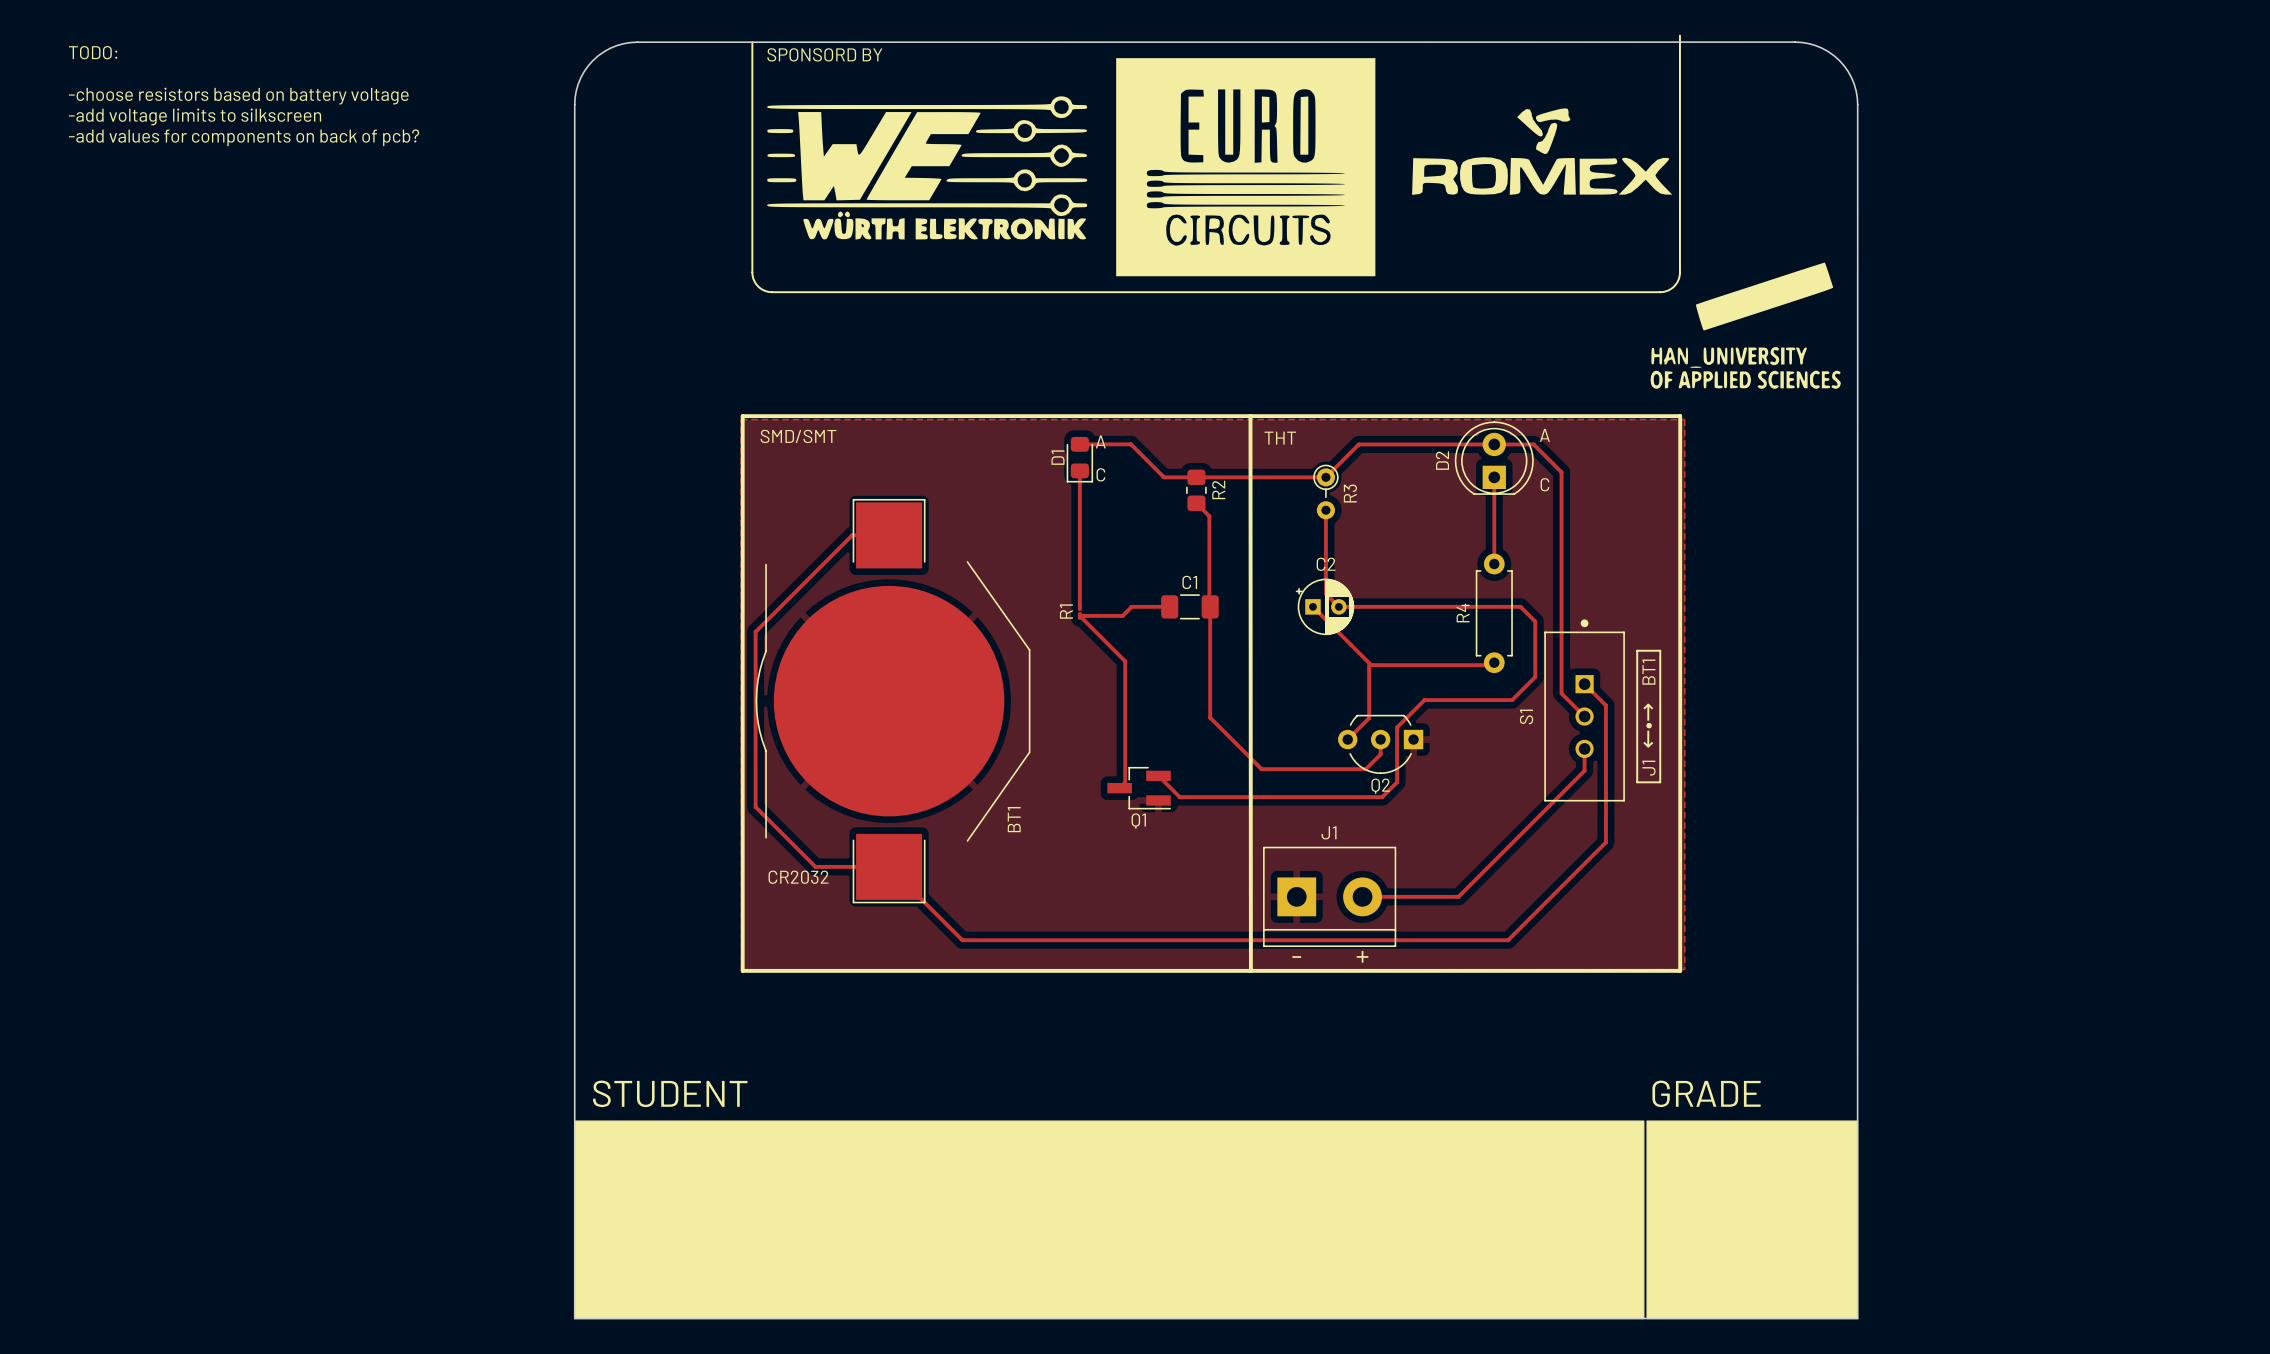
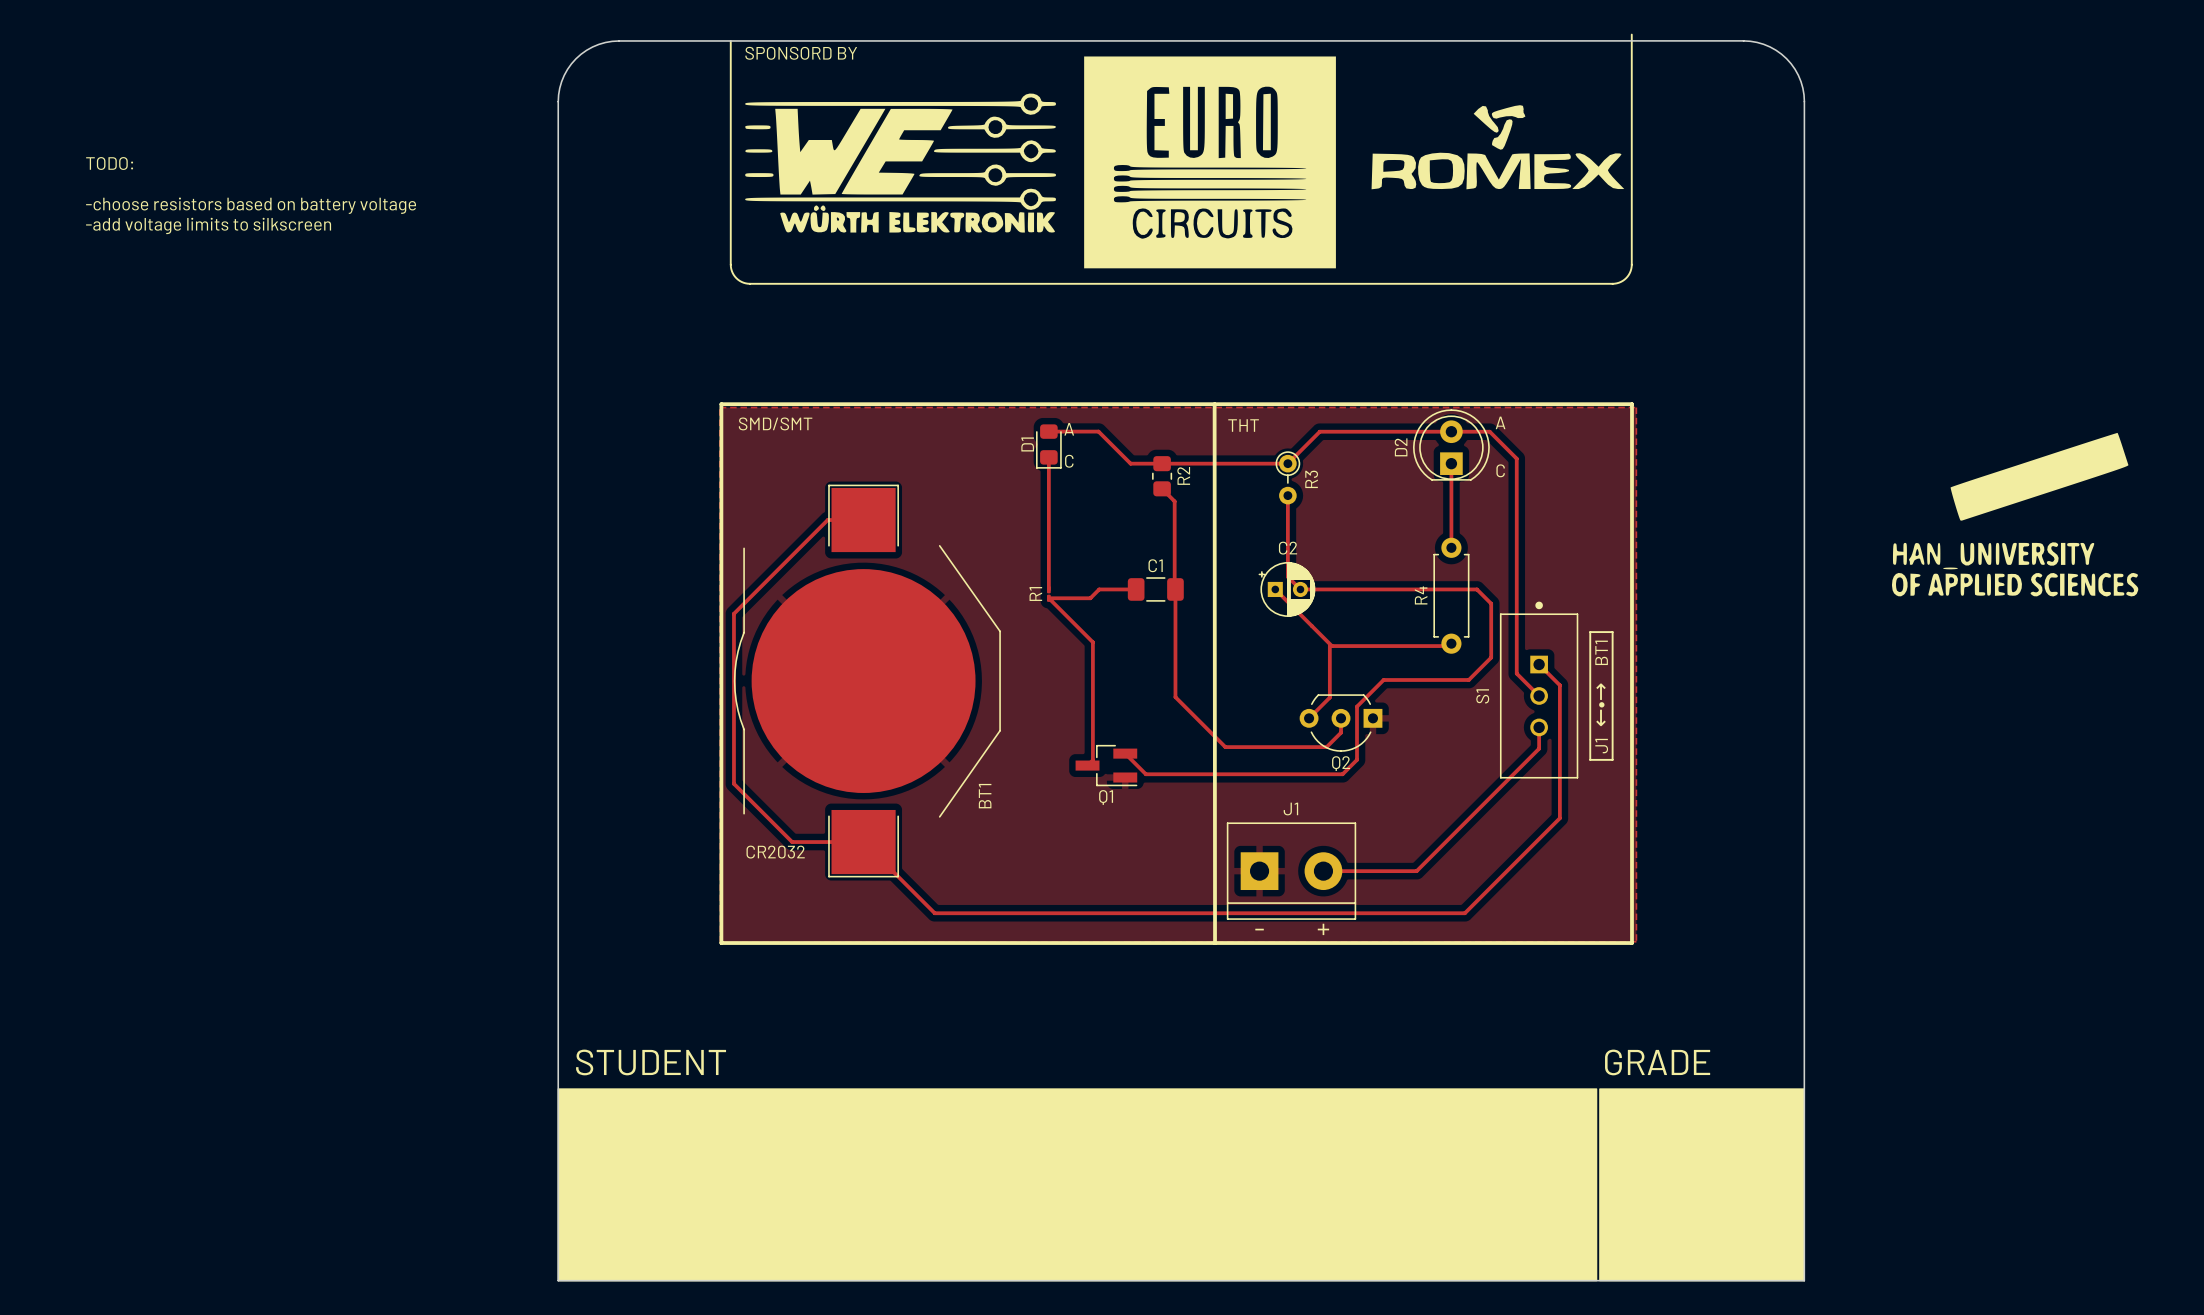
text position: TODO: (93, 52) -> TODO: (109, 163)
text position: -choose resistors based on battery voltage (238, 96) -> -choose resistors based on battery voltage (251, 205)
text position: -add voltage limits to silkscreen (195, 116) -> -add voltage limits to silkscreen (208, 225)
text: -add values for components on back of pcb? (244, 137) -> none
drawing: [1650, 262, 1841, 389] -> none
drawing: none -> [1892, 432, 2139, 597]

